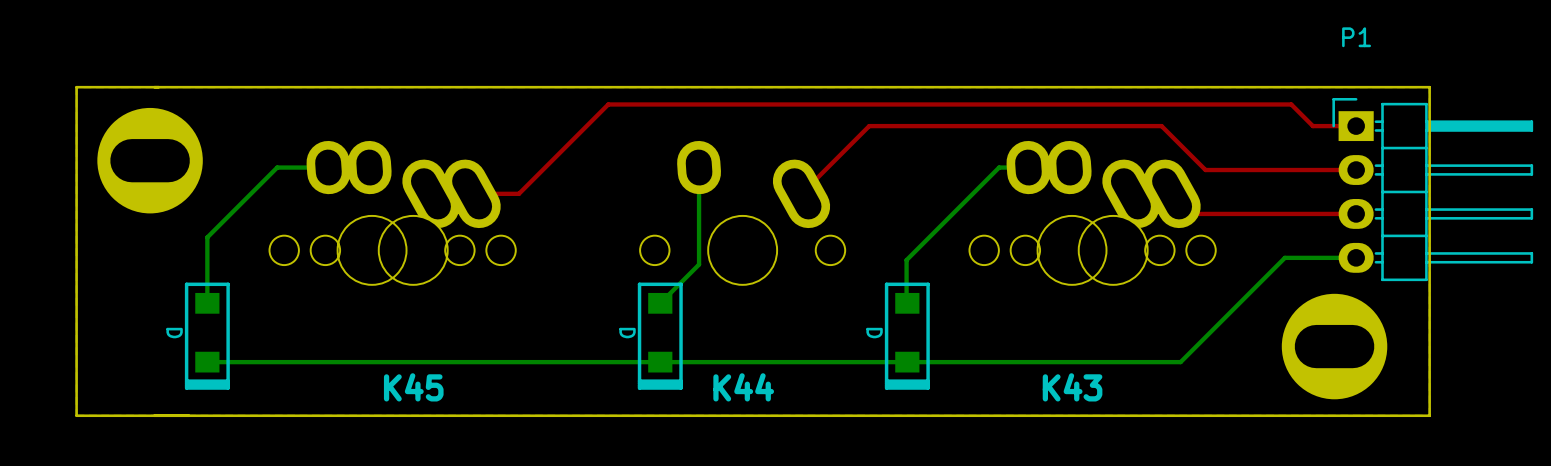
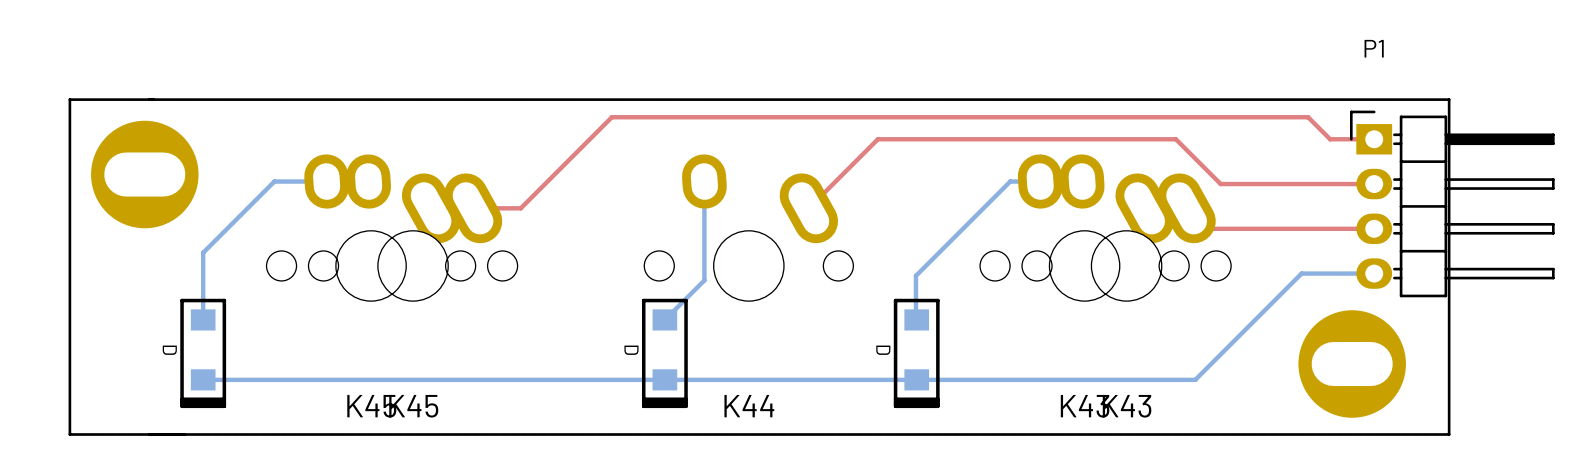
part value: none -> K45 (371, 406)
part value: none -> K43 (1127, 406)

